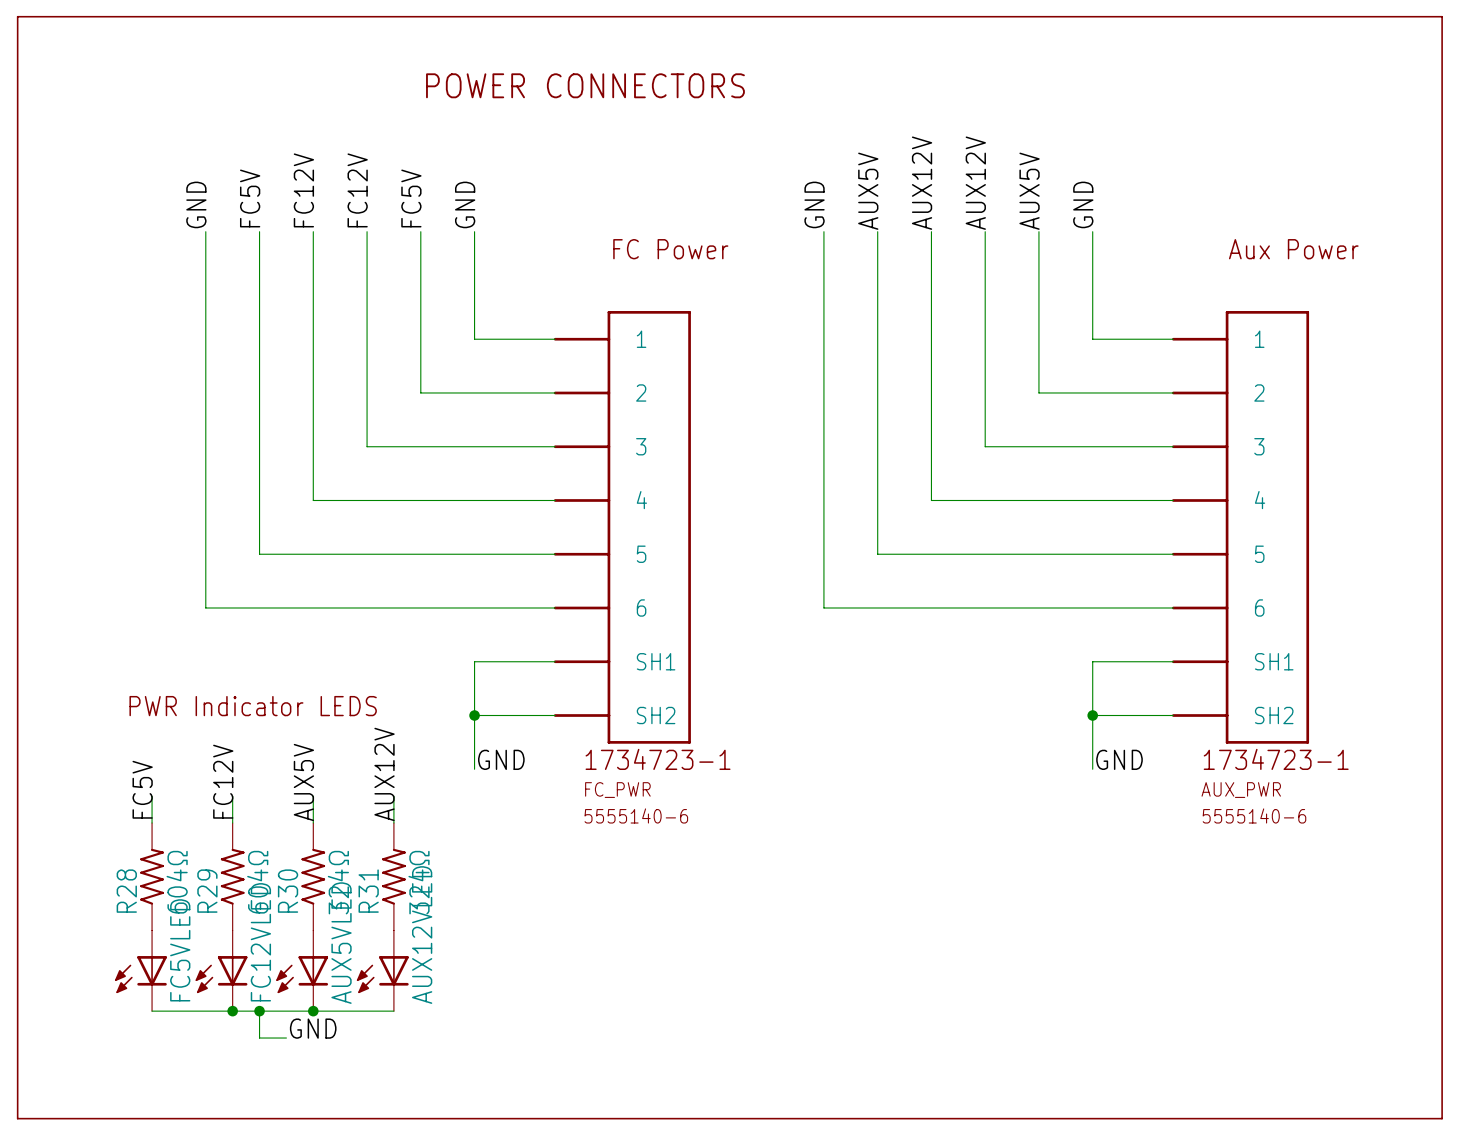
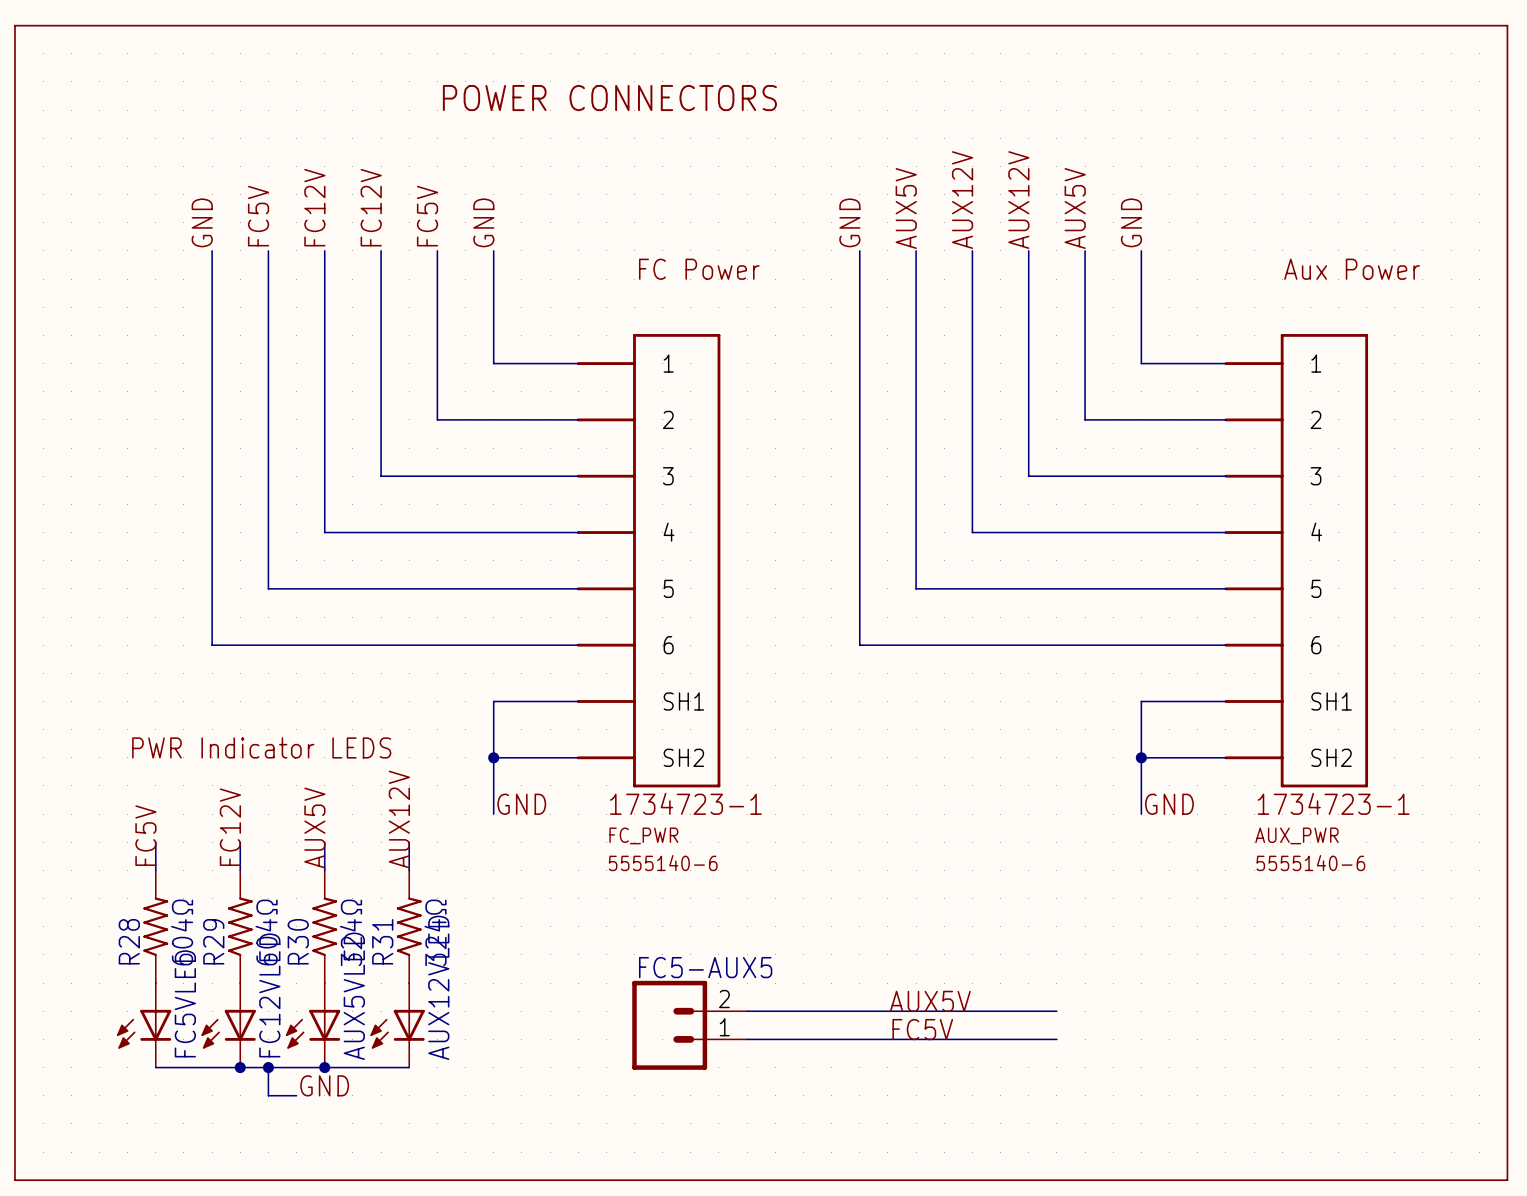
label: none -> AUX5V (930, 1001)
wire: none -> (747, 1011) (1056, 1011)
FC5-AUX5: none -> (689, 1025)
label: none -> FC5V (922, 1029)
wire: none -> (747, 1039) (1056, 1039)

